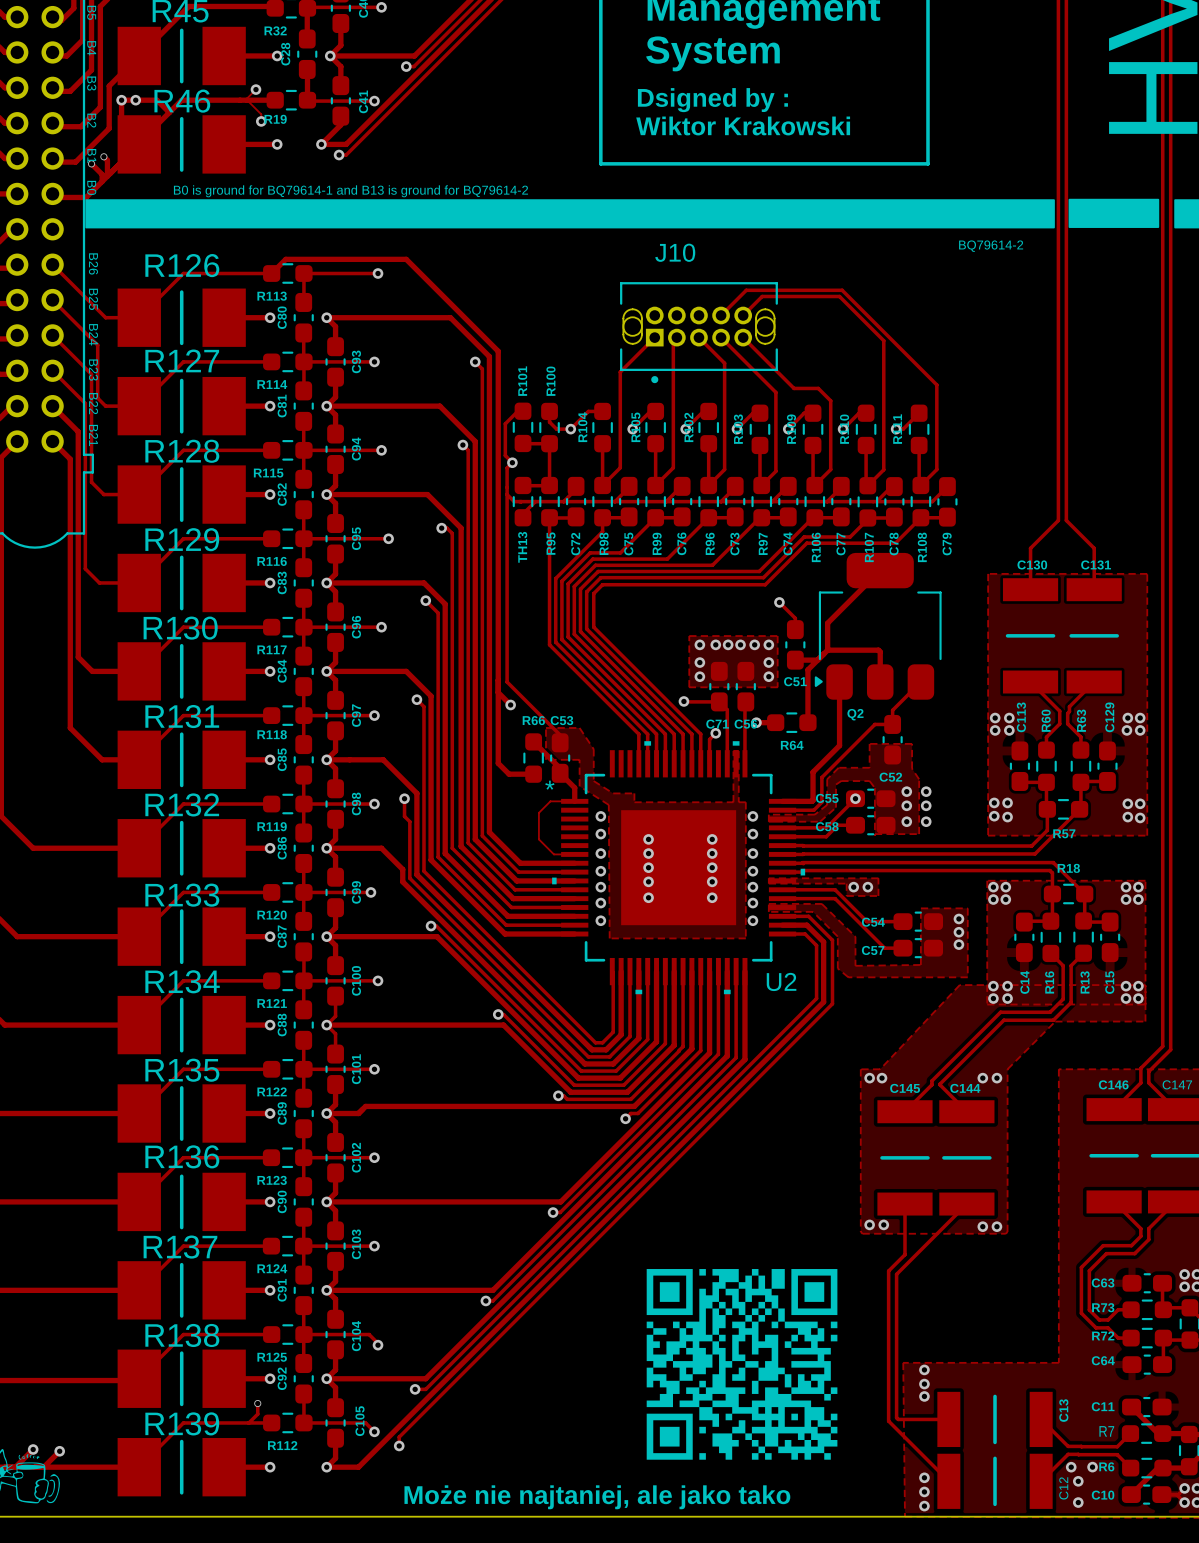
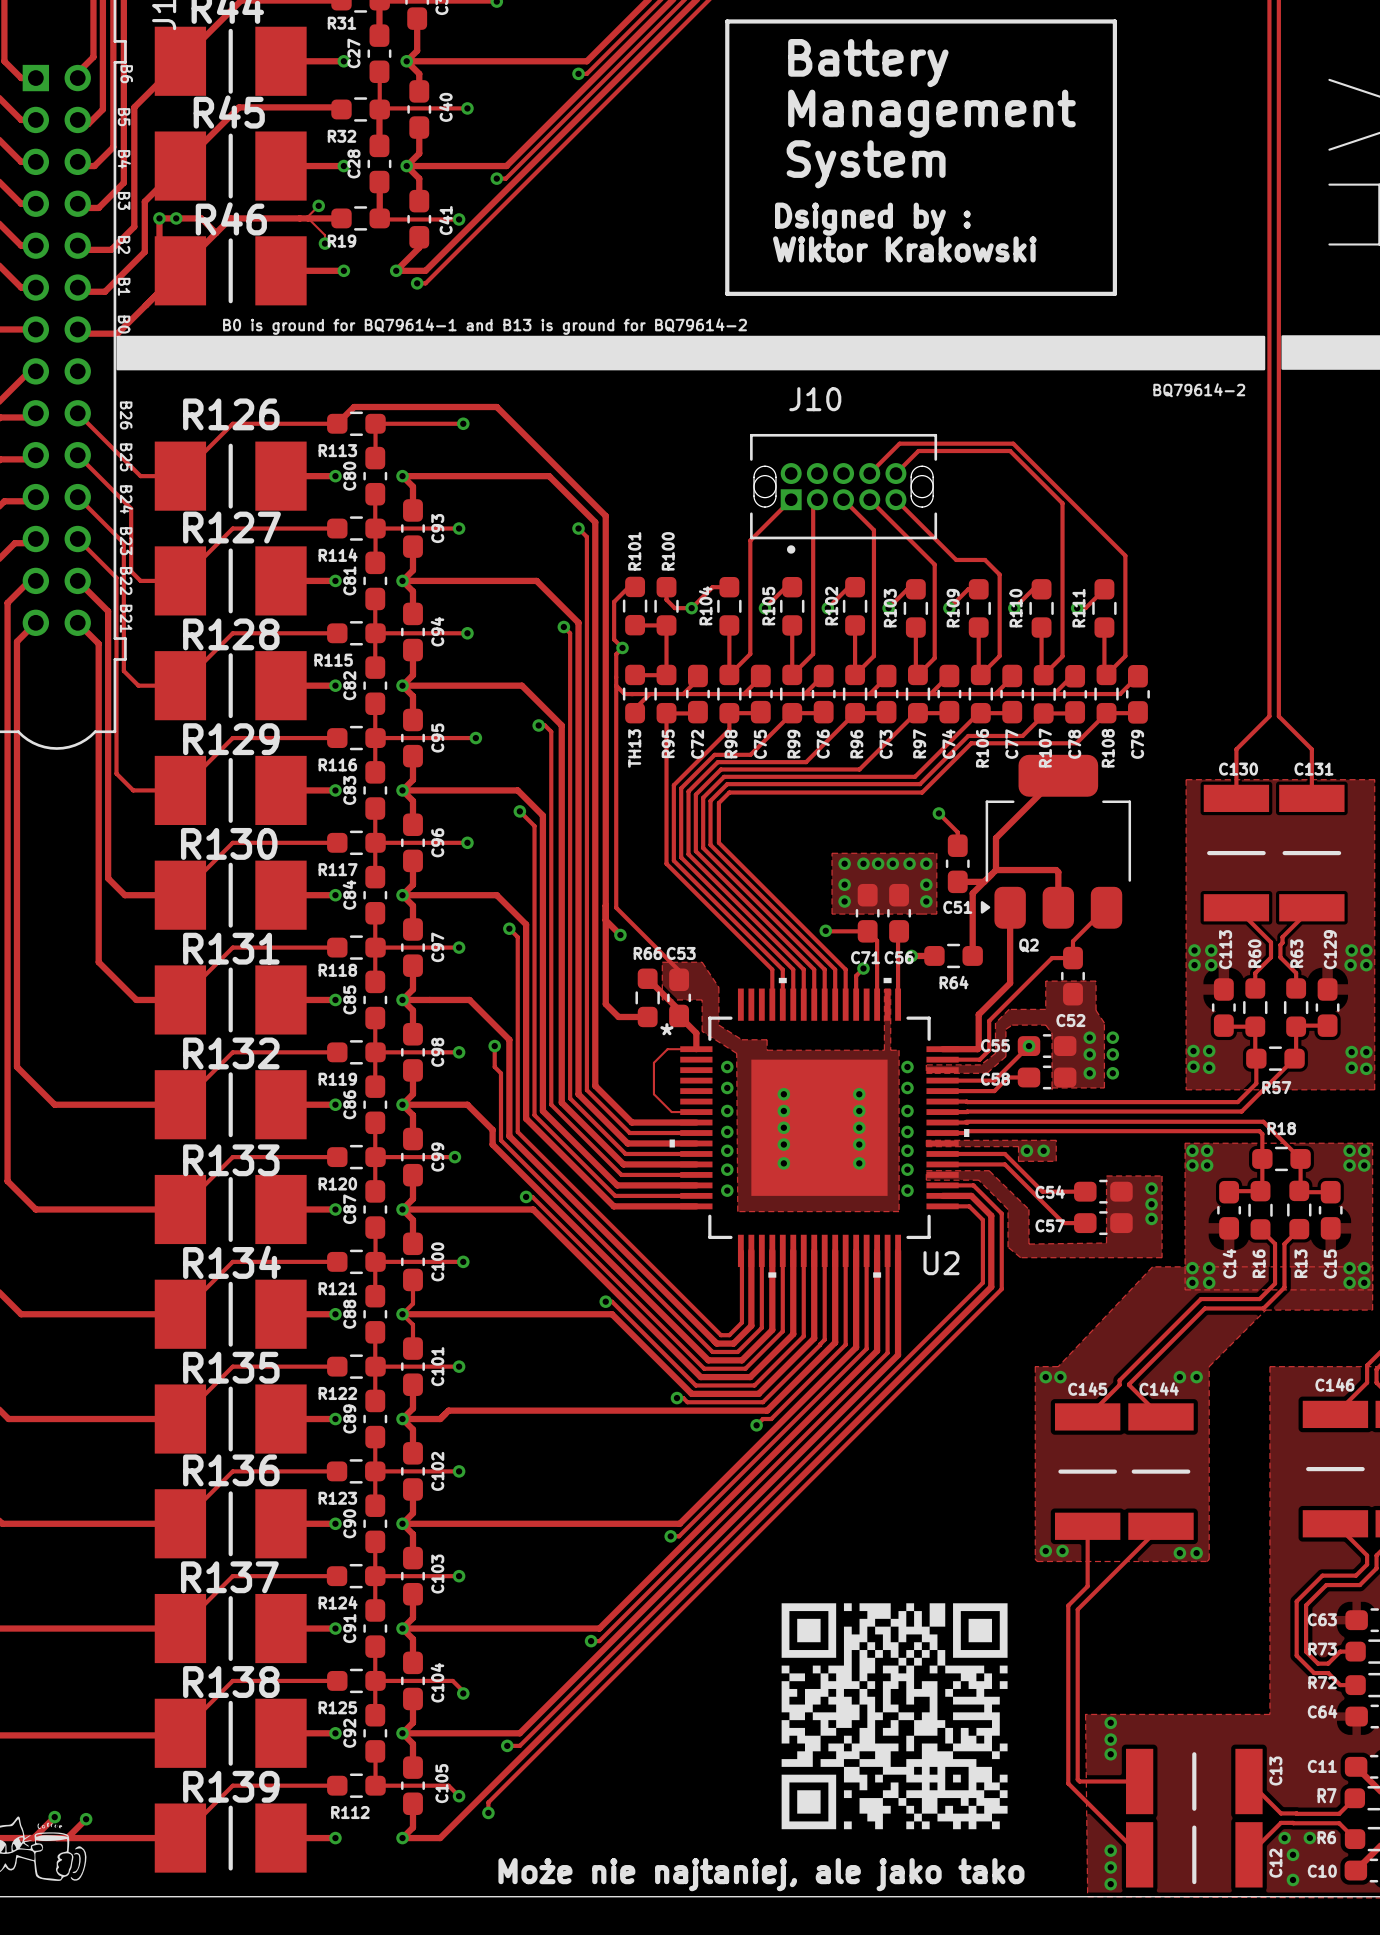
track: (103, 156) (107, 160) (107, 176) -> none
via: (103, 156) -> none
track: (91, 163) (102, 174) (102, 181) -> none
via: (91, 163) -> none
track: (257, 1403) (257, 1414) (248, 1422) -> none
via: (257, 1403) -> none

